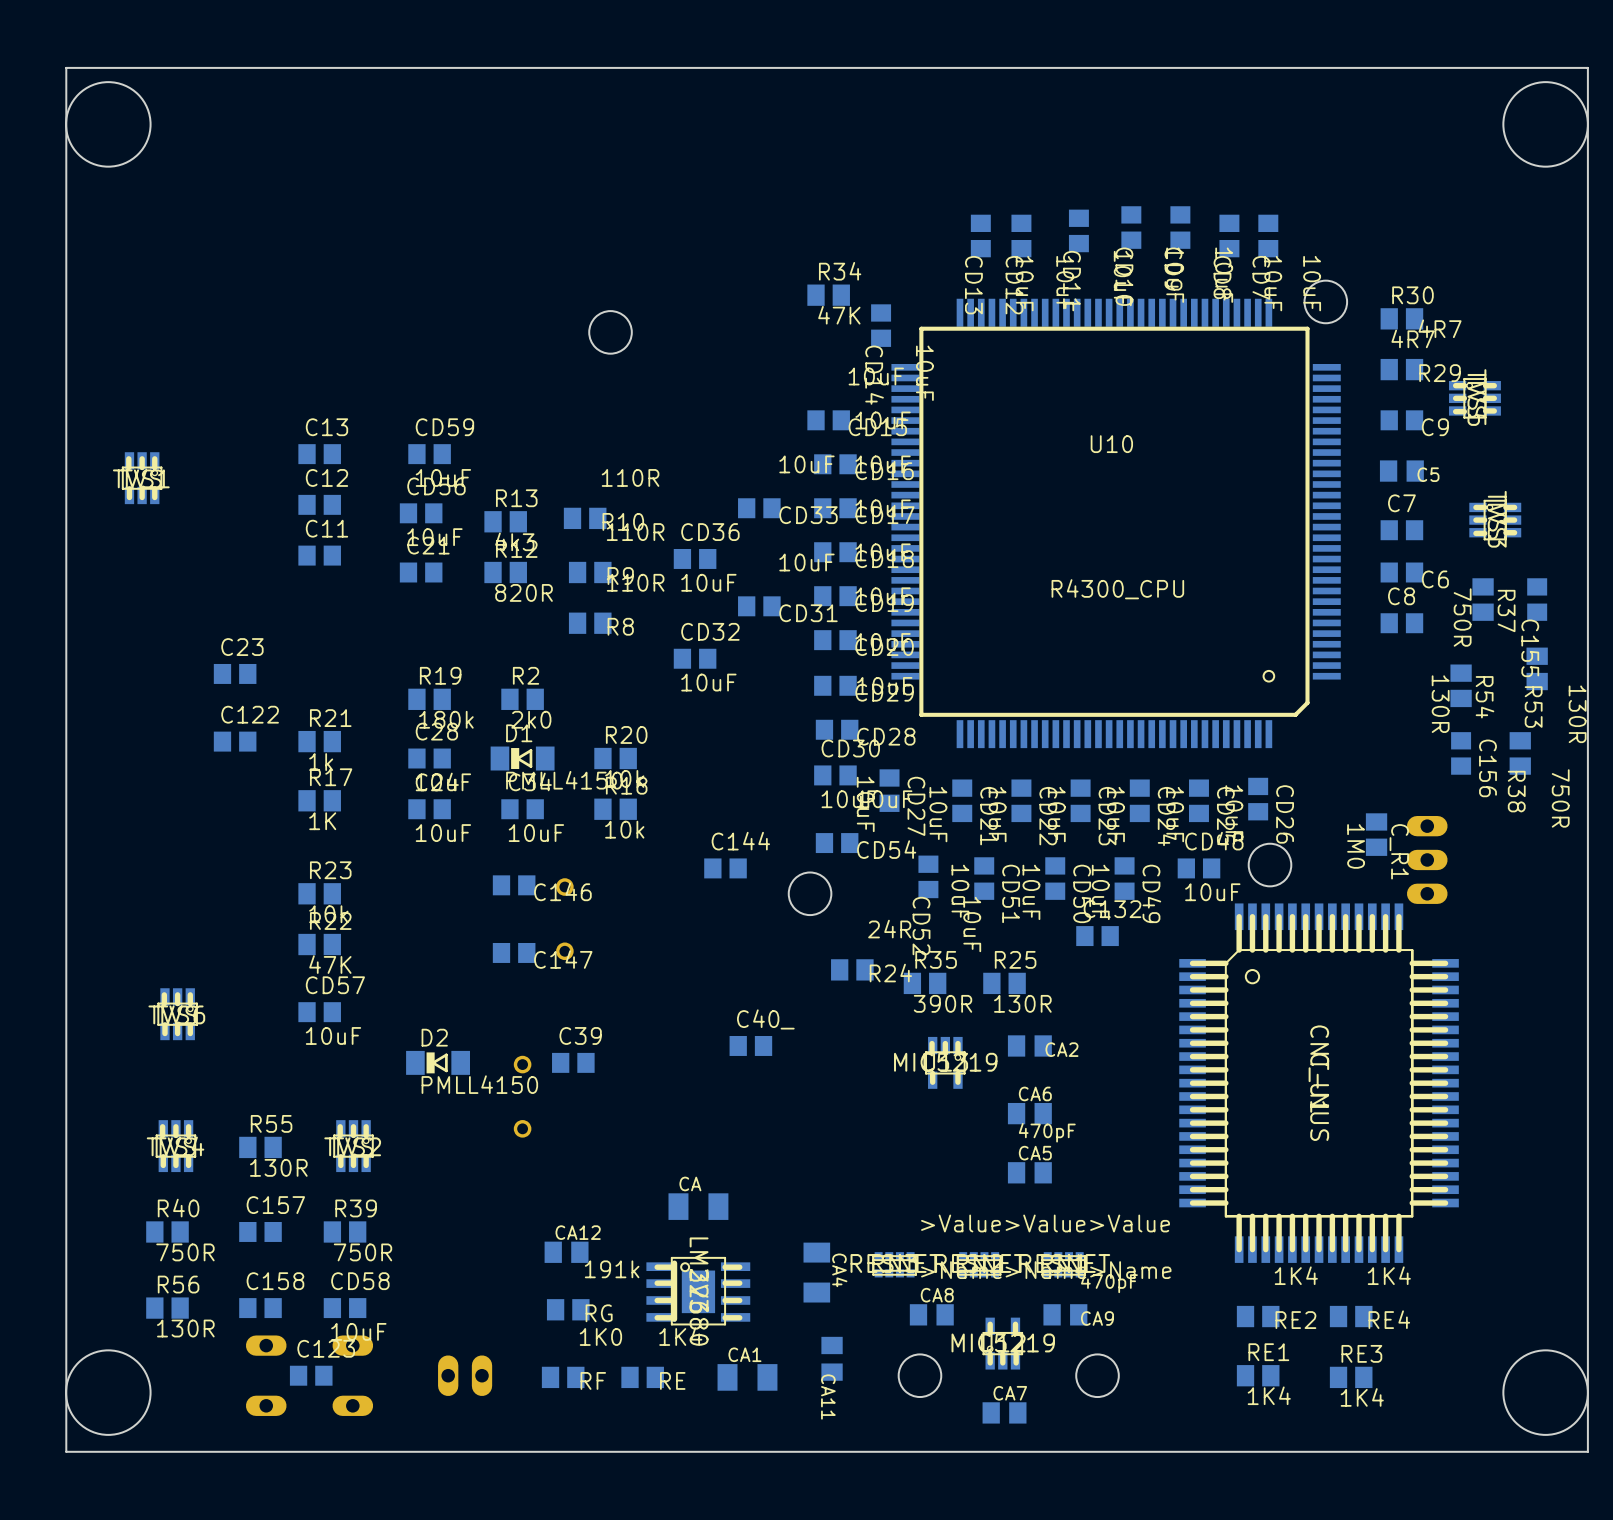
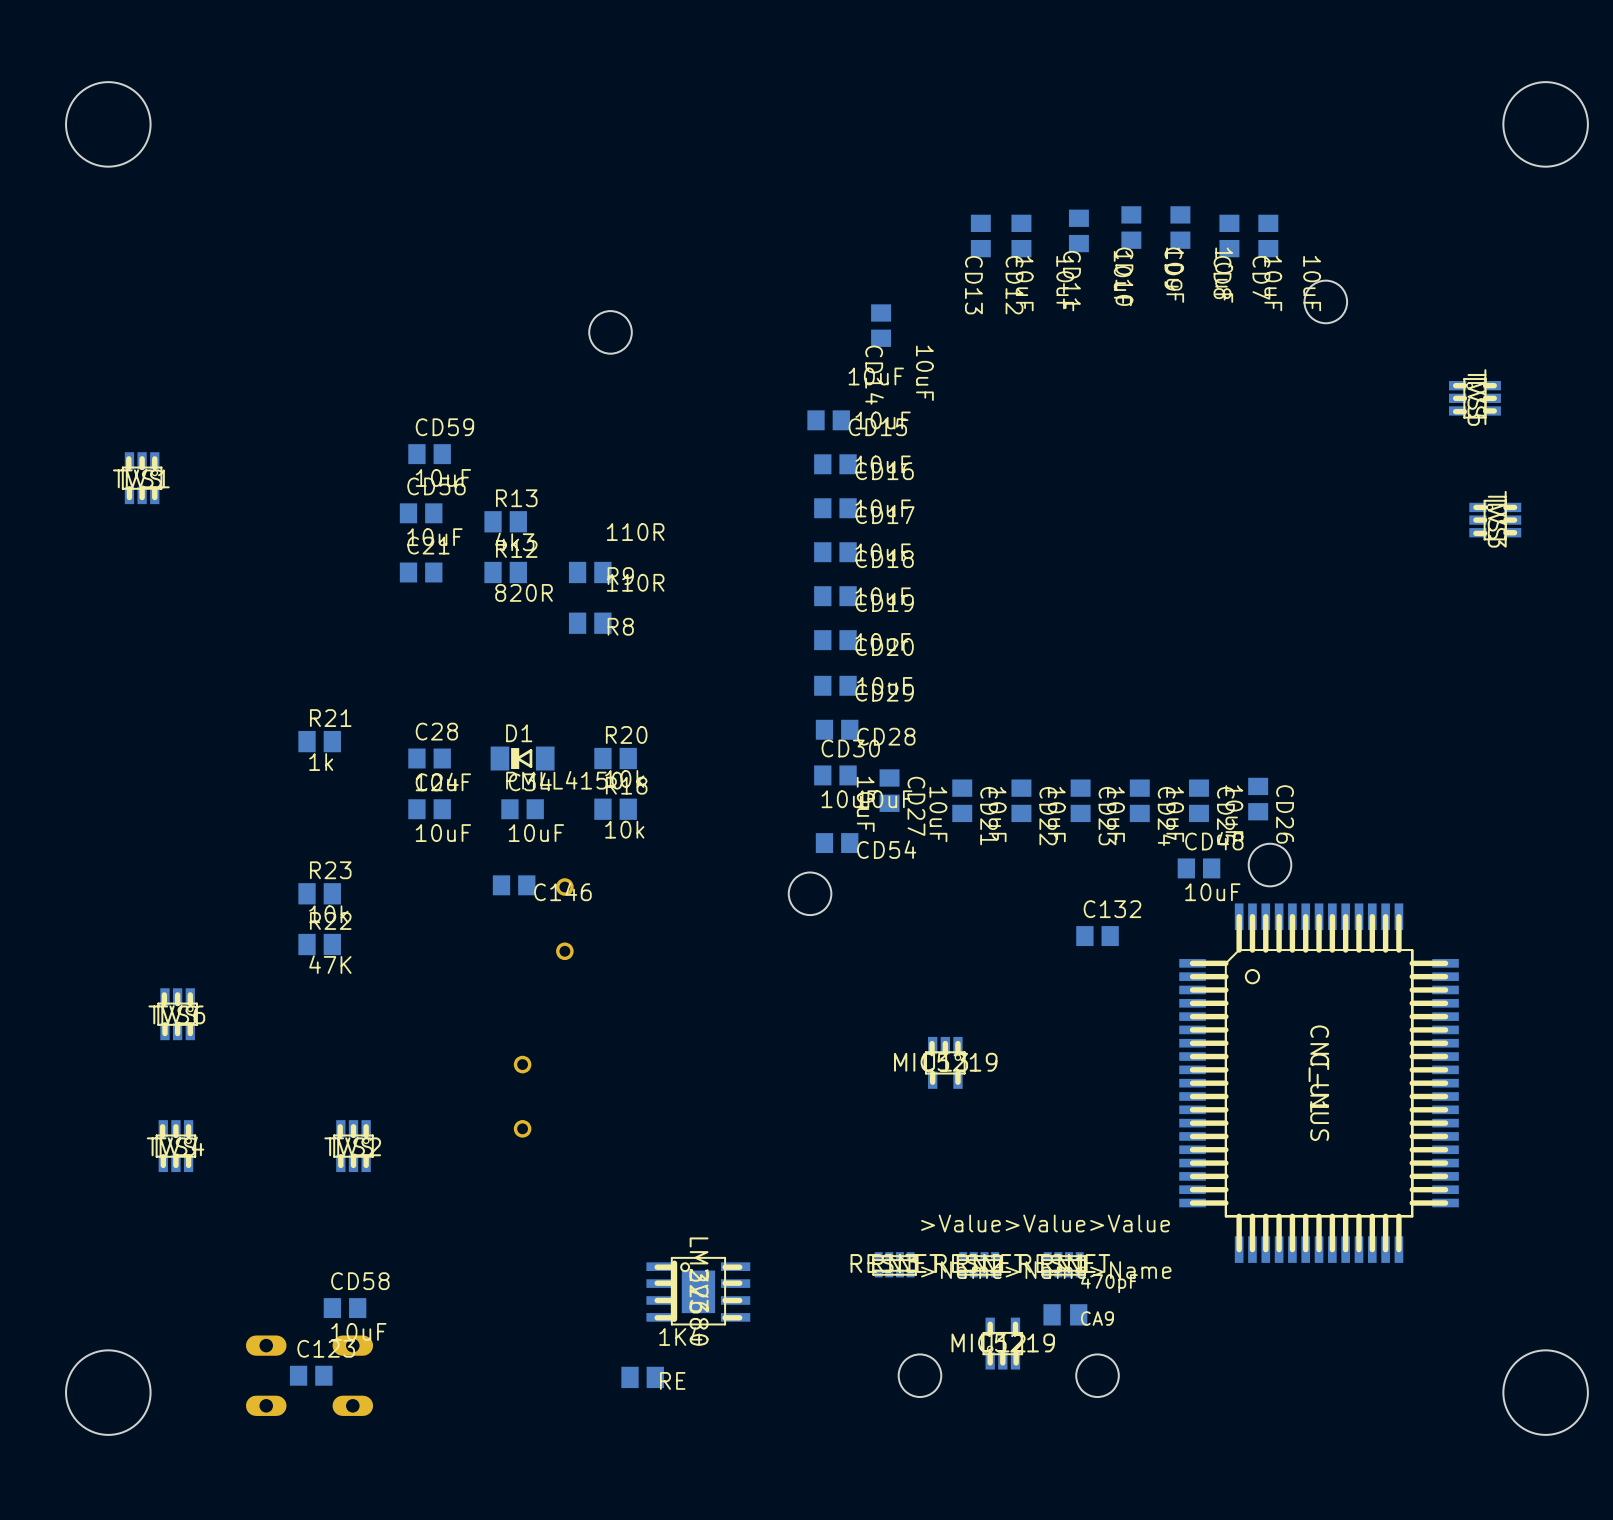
board edge: (1587, 67) (66, 67) (66, 1451) (1587, 1451) (1587, 67) -> none
R34: 47K (828, 295) -> none
R30: 4R7 (1401, 318) -> none
R29: 4R7 (1401, 369) -> none
C9: (1401, 420) -> none
C13: (319, 454) -> none
C5: (1401, 471) -> none
C12: (319, 504) -> none
CD33: 10uF (759, 508) -> none
R10: 110R (585, 518) -> none
U10: R4300_CPU (1116, 523) -> none
C7: (1401, 530) -> none
C11: (319, 555) -> none
CD36: 10uF (695, 558) -> none
C6: (1401, 572) -> none
R37: 750R (1483, 599) -> none
C155: (1537, 599) -> none
CD31: 10uF (759, 606) -> none
C8: (1401, 623) -> none
CD32: 10uF (695, 658) -> none
R53: 130R (1537, 668) -> none
C23: (235, 673) -> none
R54: 130R (1461, 685) -> none
R19: 180k (429, 699) -> none
R2: 2k0 (522, 699) -> none
C122: (235, 741) -> none
C156: (1461, 753) -> none
R38: 750R (1520, 753) -> none
R17: 1K (319, 800) -> none
C_R1: 1M0 (1376, 834) -> none
part: (1427, 859) -> none
C144: (725, 868) -> none
CD52: 10uF (928, 876) -> none
CD51: 10uF (984, 878) -> none
CD50: 10uF (1055, 878) -> none
CD49: 10uF (1124, 878) -> none
C147: (514, 952) -> none
R24: 24R (852, 969) -> none
R35: 390R (925, 983) -> none
R25: 130R (1004, 983) -> none
CD57: 10uF (319, 1012) -> none
C40_: (750, 1045) -> none
CA2: (1029, 1045) -> none
D2: PMLL4150 (438, 1062) -> none
C39: (573, 1062) -> none
CA6: 470pF (1029, 1113) -> none
R55: 130R (260, 1147) -> none
CA5: (1029, 1172) -> none
CA: (698, 1206) -> none
R40: 750R (167, 1231) -> none
C157: (260, 1231) -> none
R39: 750R (345, 1231) -> none
CA12: (566, 1252) -> none
CA4: (816, 1272) -> none
R56: 130R (167, 1308) -> none
C158: (260, 1308) -> none
RG: 191k (568, 1309) -> none
CA8: (931, 1314) -> none
RE2: 1K4 (1258, 1316) -> none
RE4: 1K4 (1351, 1316) -> none
CA11: (832, 1358) -> none
part: (465, 1375) -> none
RE1: 1K4 (1258, 1375) -> none
RF: 1K0 (563, 1377) -> none
CA1: (747, 1377) -> none
RE3: 1K4 (1351, 1377) -> none
CA7: (1004, 1412) -> none

